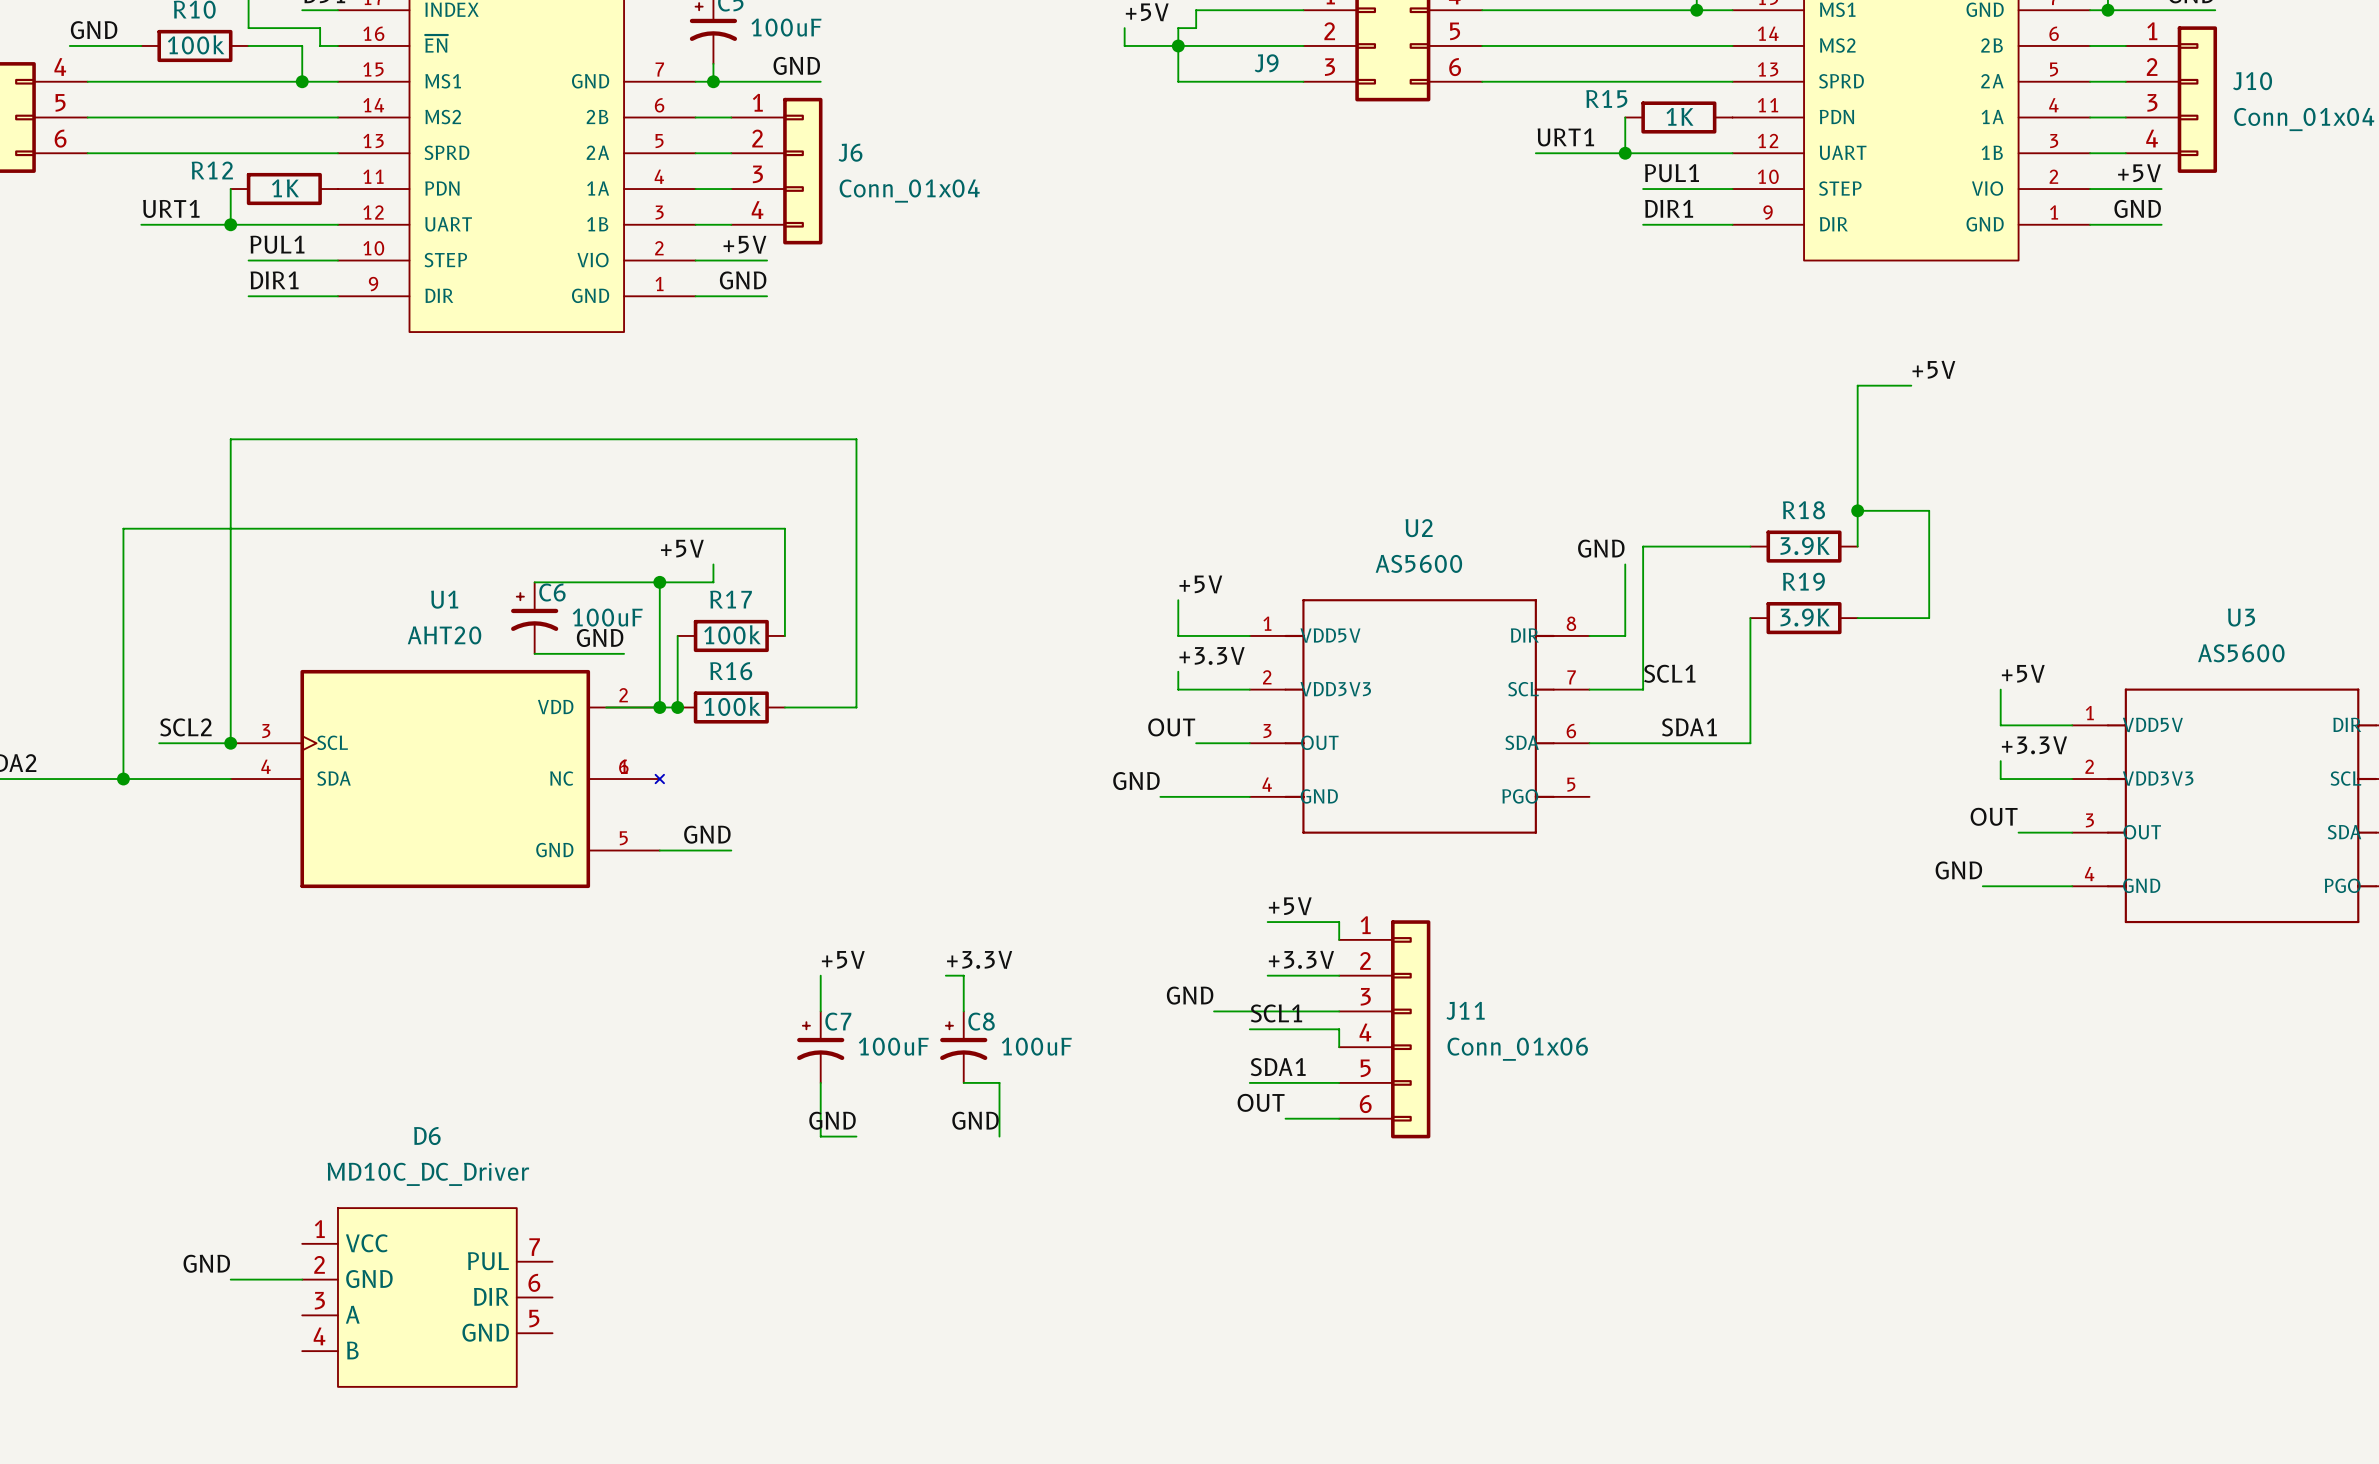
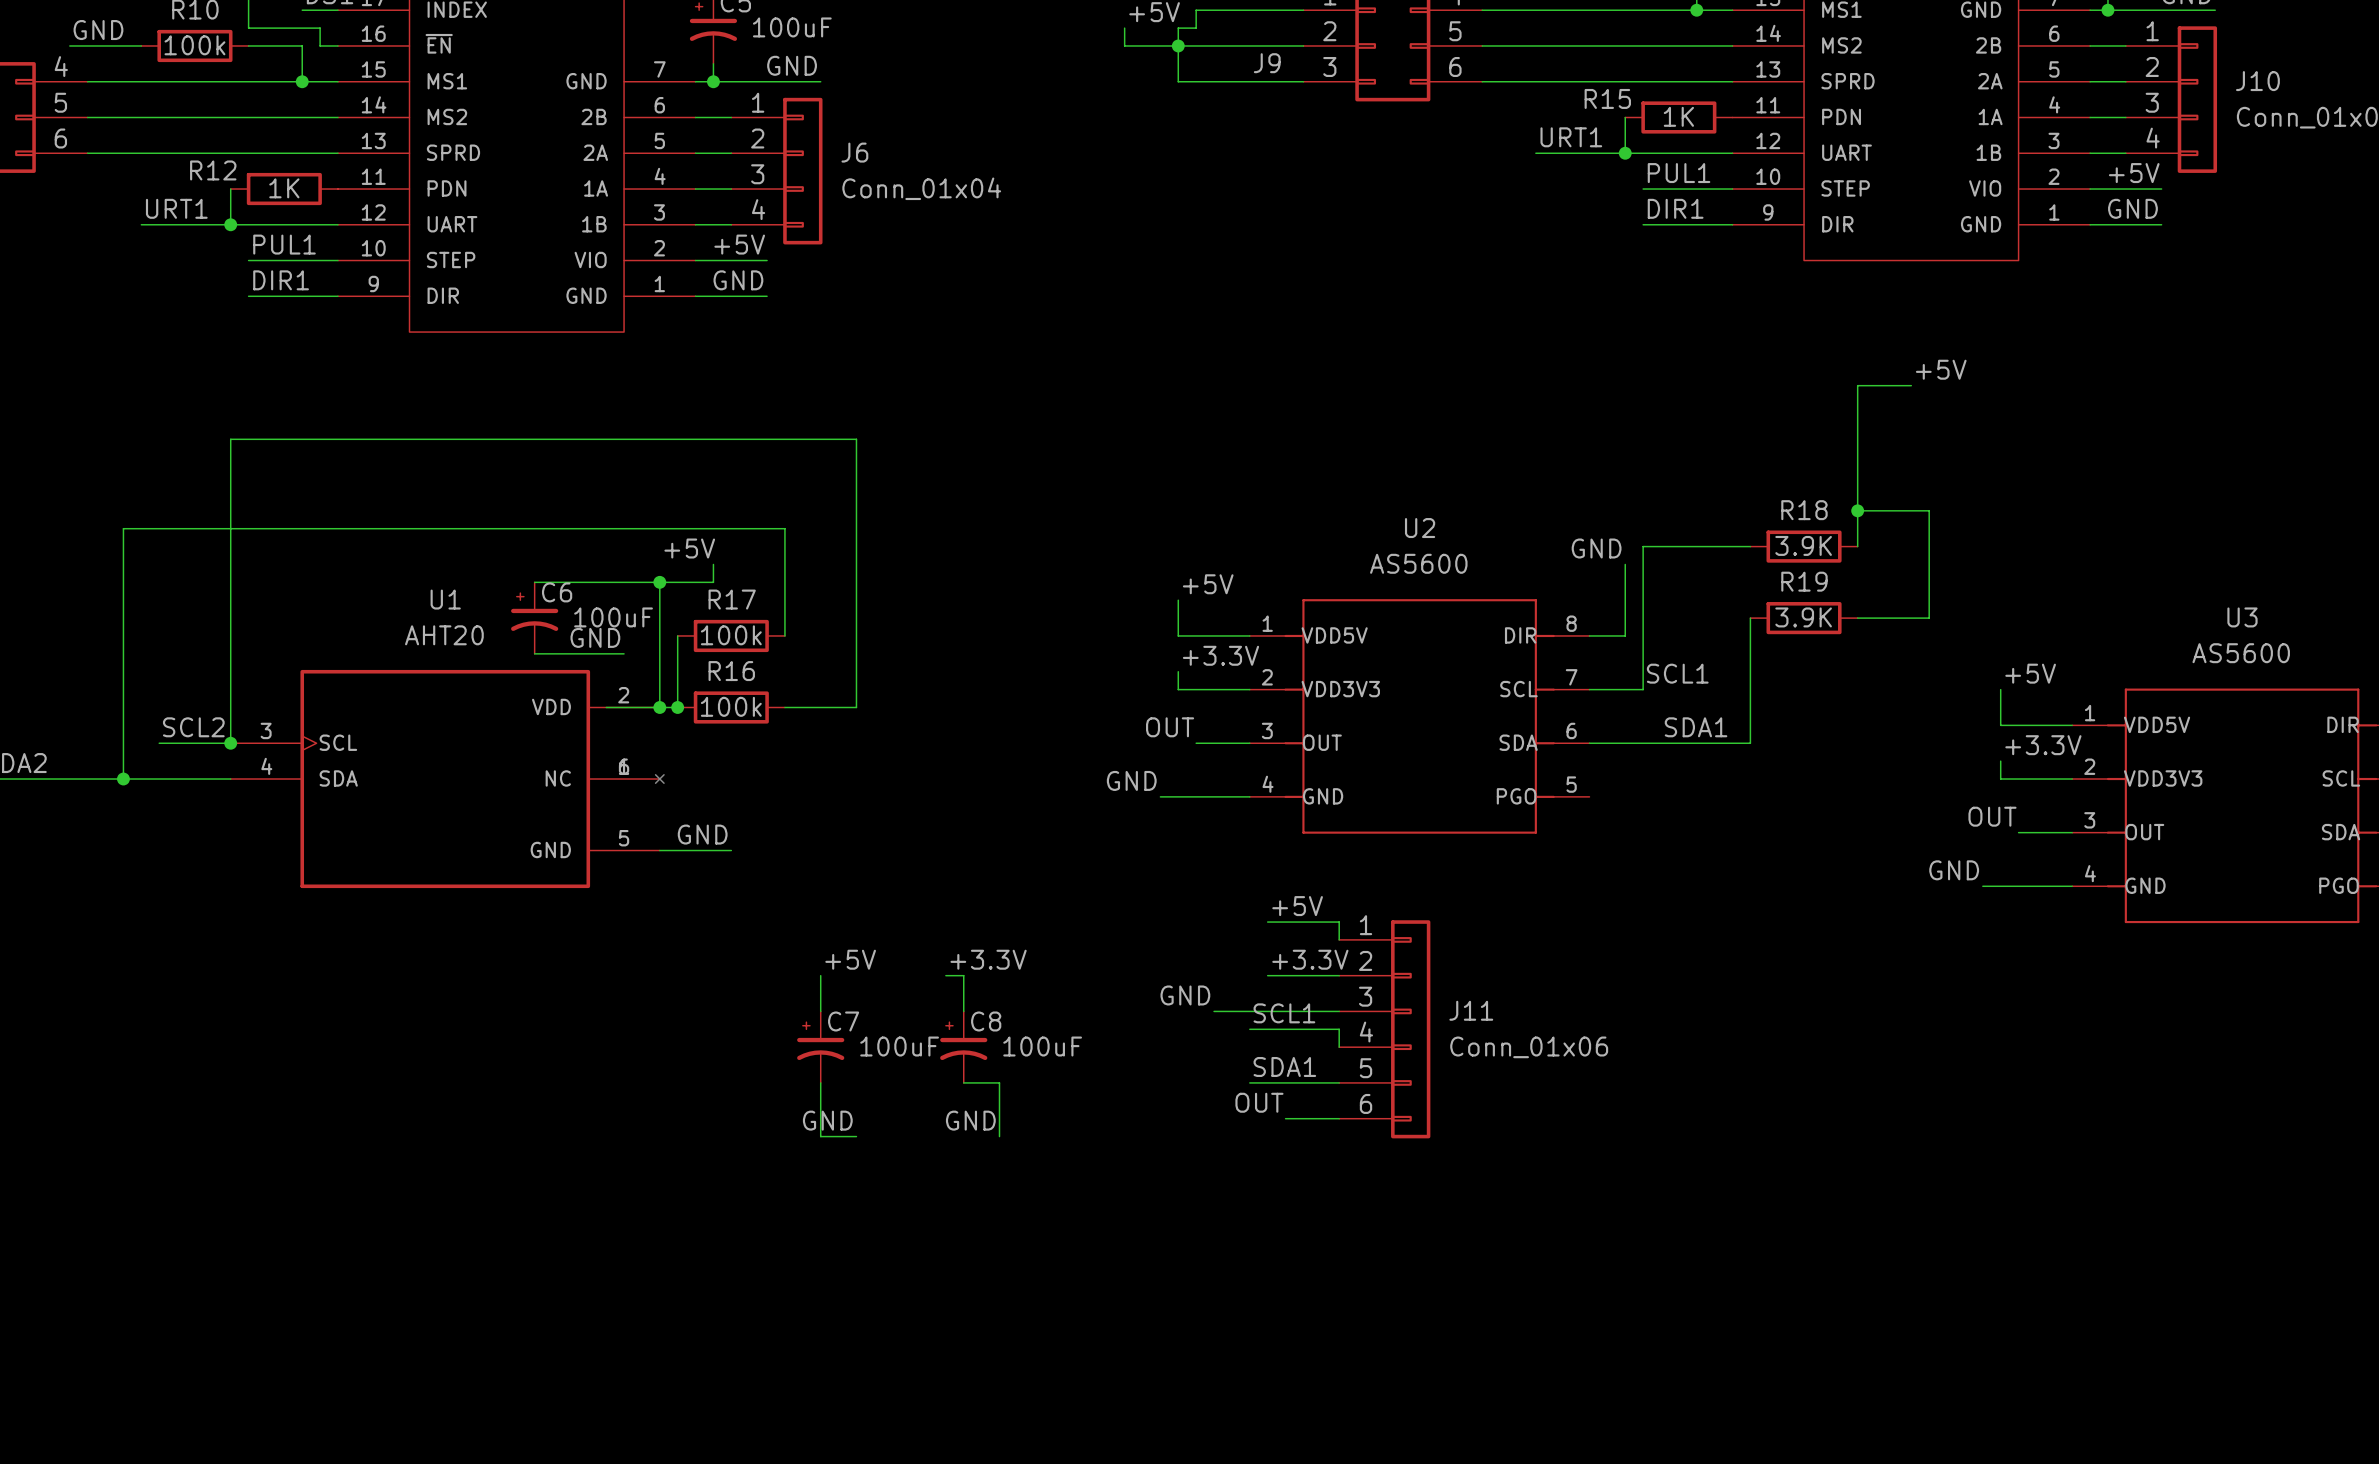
label: GND (206, 1263) -> none
wire: (230, 1279) (302, 1279) -> none
D6: MD10C_DC_Driver (427, 1297) -> none

